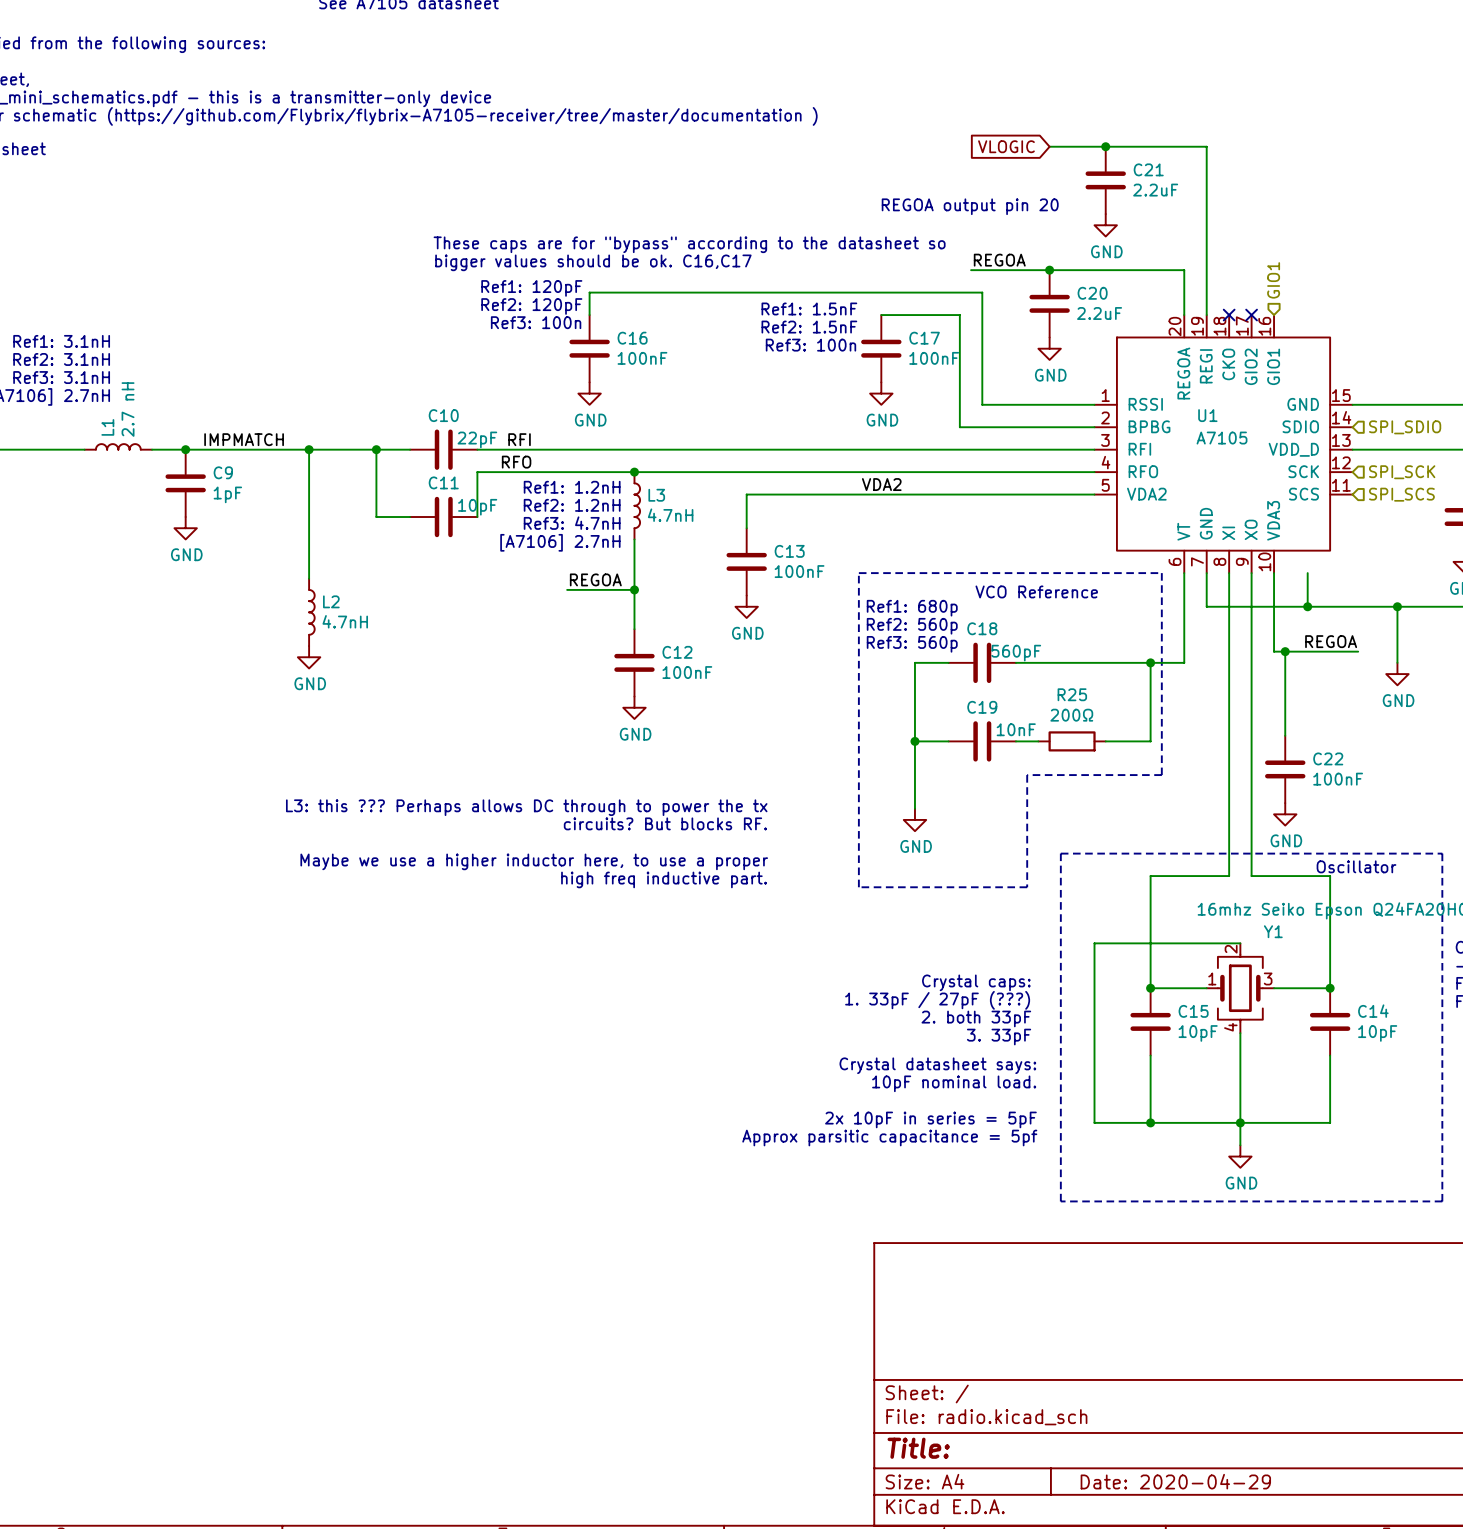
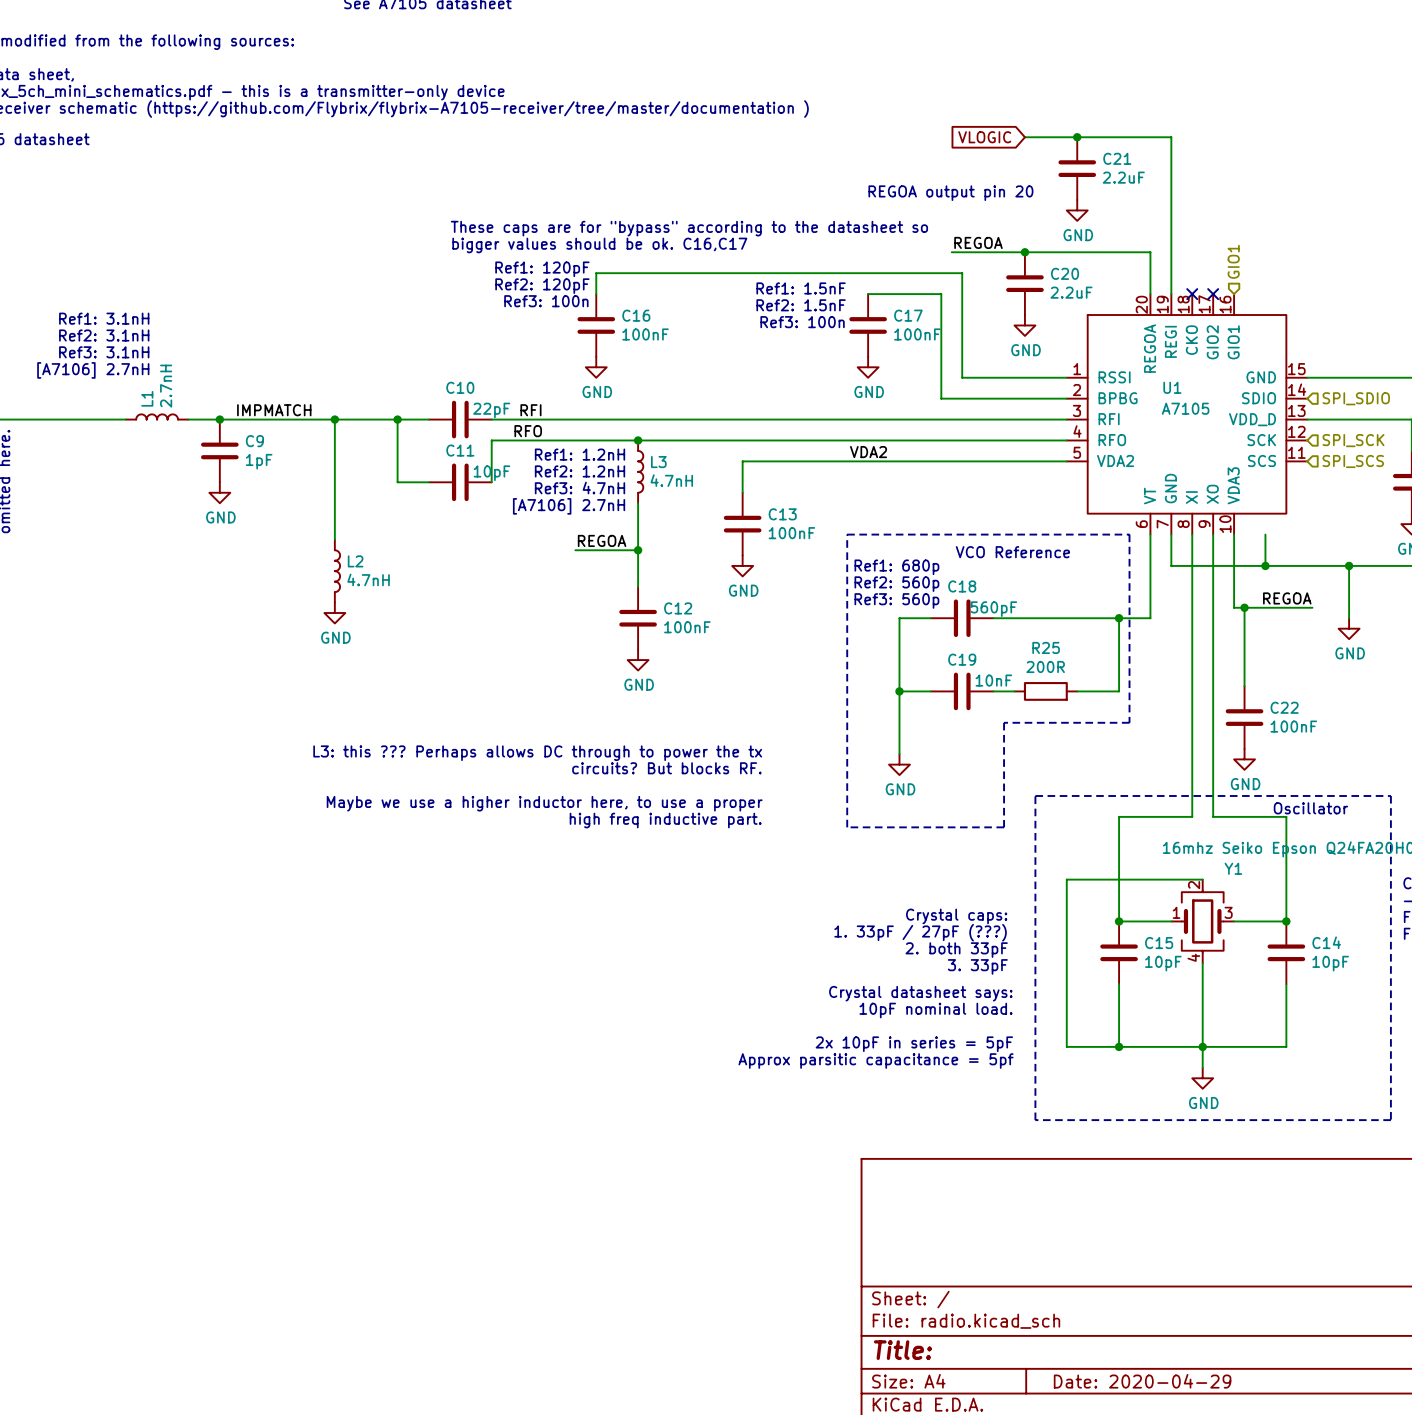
L1 value: 2.7 nH (128, 409) -> 2.7nH (166, 386)
R25 value: 200Ω (1071, 715) -> 200R (1045, 666)

